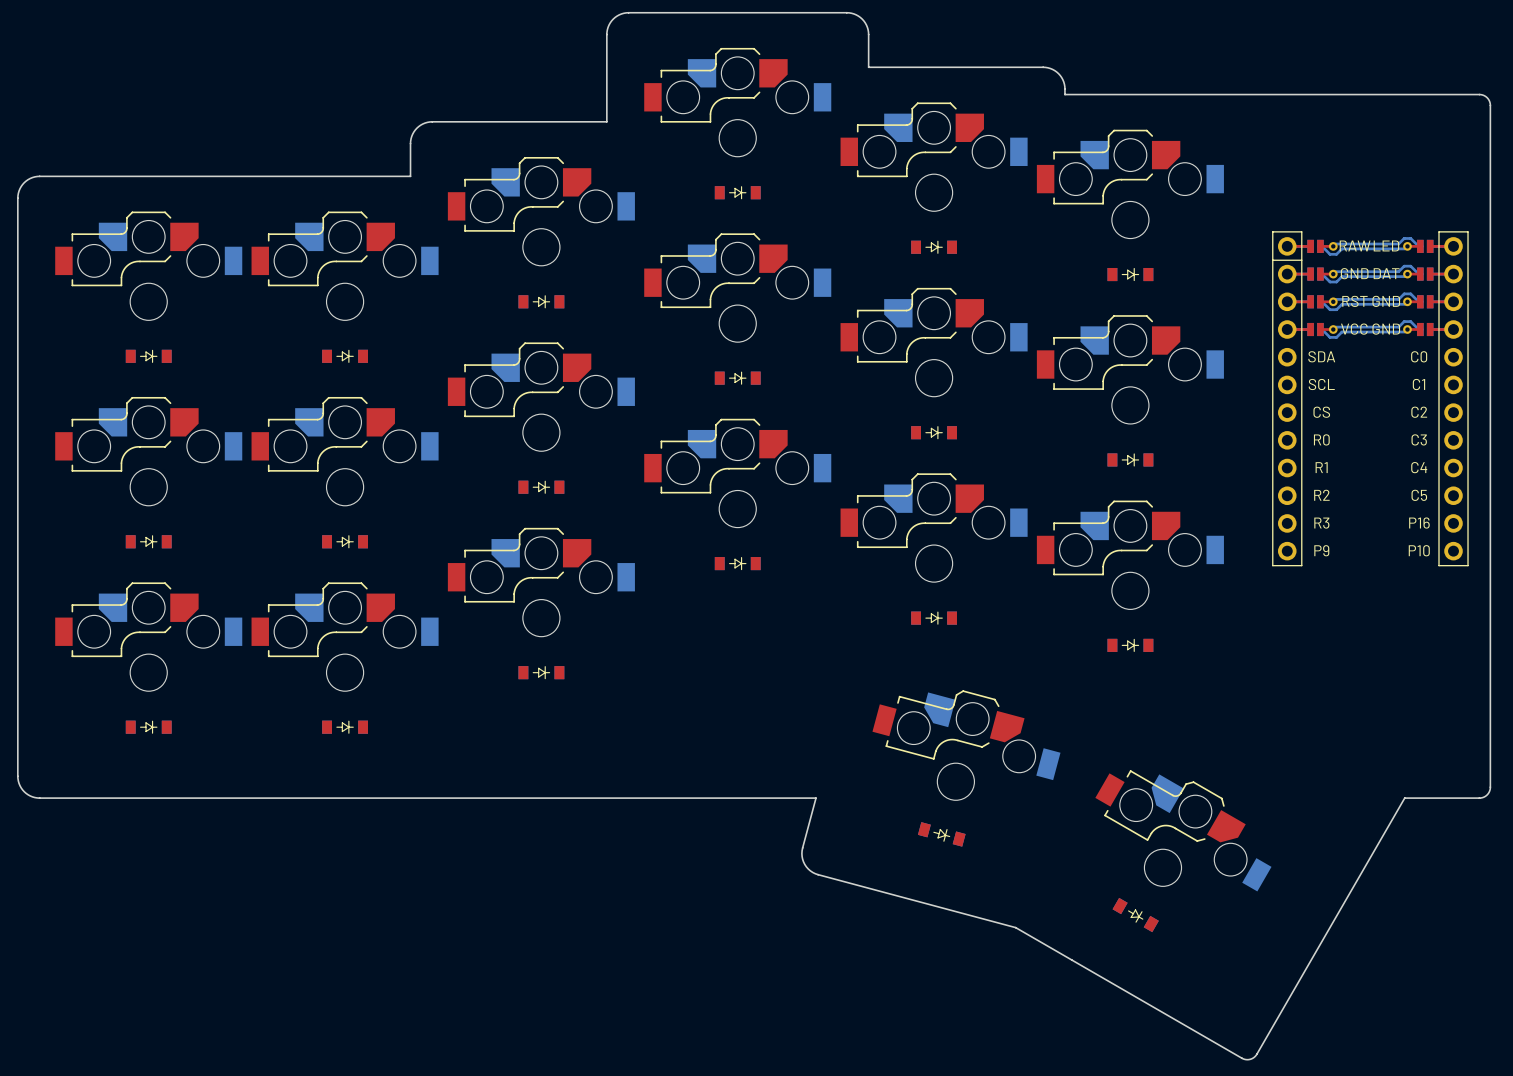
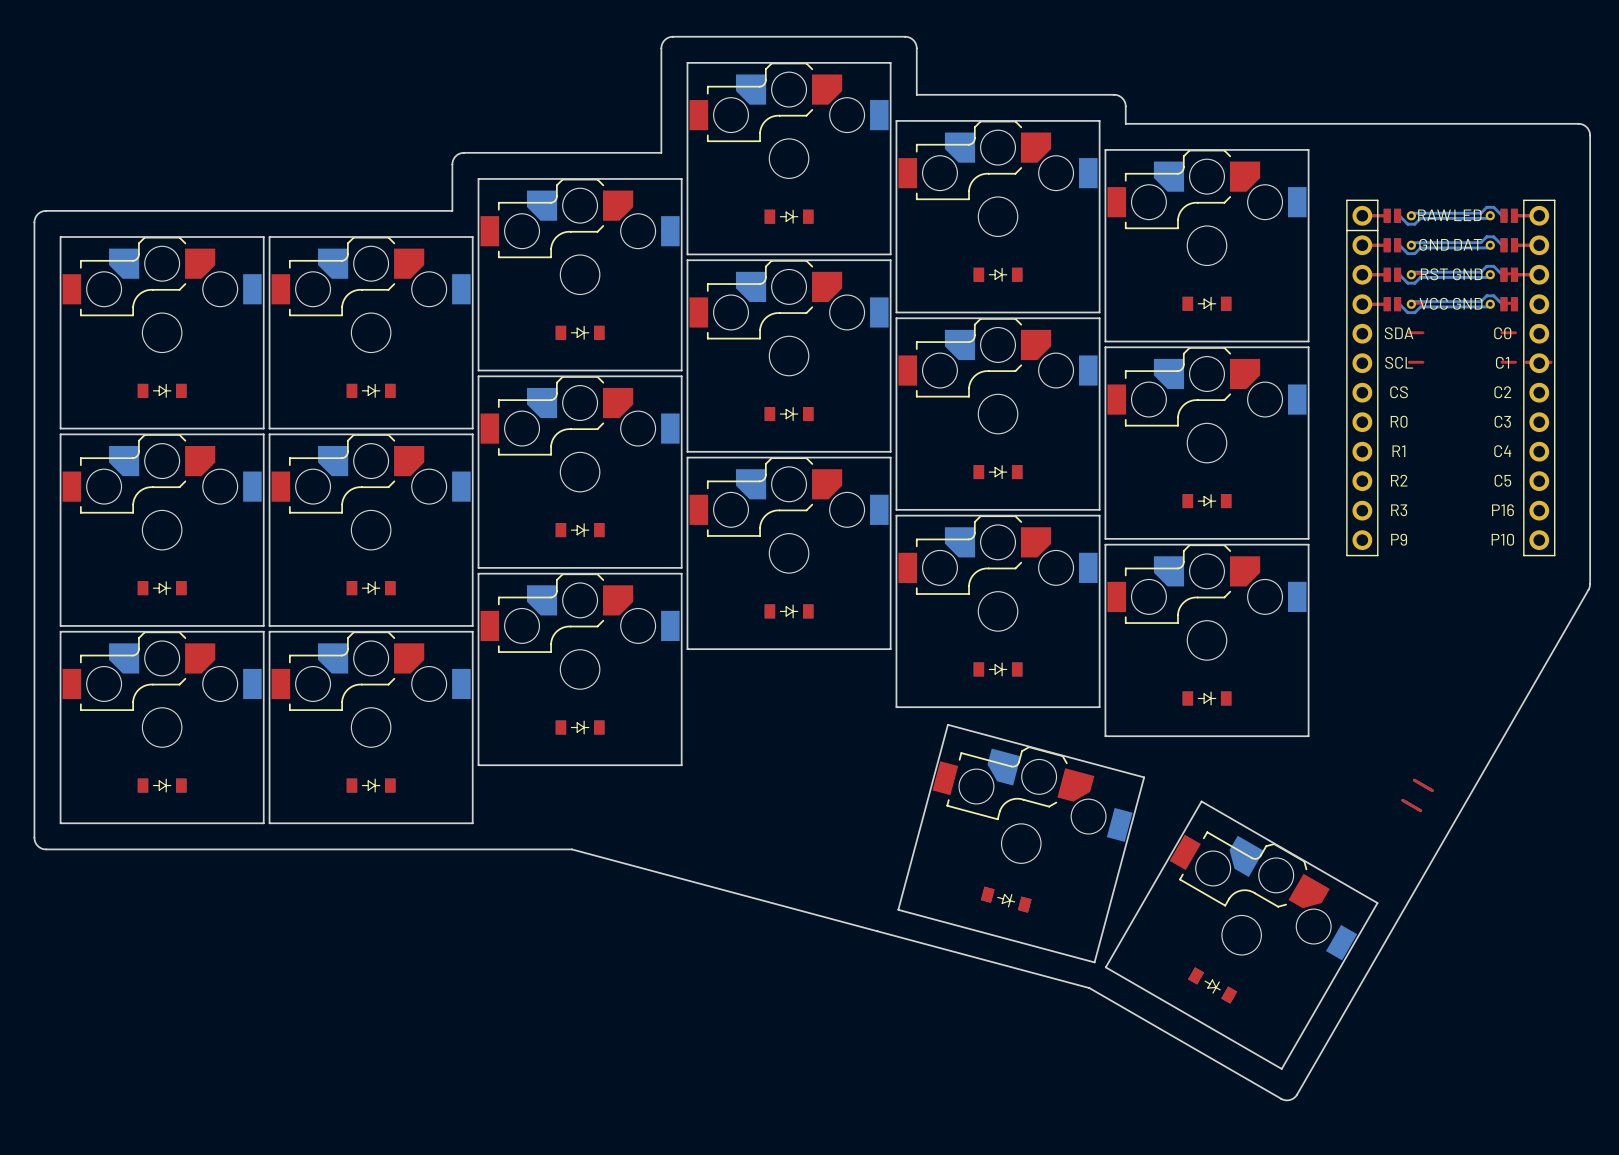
board edge: none -> (687, 62) (687, 254) (890, 254) (890, 62) (687, 62)
board edge: none -> (896, 120) (896, 312) (1099, 312) (1099, 120) (896, 120)
board edge: (1490, 116) (1489, 100) (1485, 96) (1479, 94) (1064, 94) (1064, 84) (1060, 75) (1052, 69) (1045, 67) (868, 67) (867, 27) (862, 19) (851, 13) (628, 12) (615, 17) (607, 29) (606, 121) (427, 122) (418, 126) (411, 136) (410, 176) (39, 176) (30, 178) (21, 186) (17, 198) (17, 778) (21, 787) (26, 793) (39, 798) (816, 798) (801, 853) (804, 864) (812, 872) (1015, 927) (1241, 1058) (1248, 1059) (1256, 1054) (1404, 798) (1480, 798) (1489, 791) (1490, 537) -> (1590, 135) (1586, 127) (1578, 123) (1125, 123) (1125, 102) (1121, 97) (1115, 94) (916, 94) (916, 47) (914, 41) (907, 37) (672, 36) (665, 39) (661, 47) (661, 152) (461, 153) (454, 157) (452, 163) (452, 210) (41, 212) (36, 216) (34, 222) (34, 839) (37, 846) (46, 849) (571, 849) (1089, 988) (1281, 1098) (1288, 1100) (1297, 1094) (1588, 589) (1590, 583)
board edge: none -> (1105, 149) (1105, 341) (1308, 341) (1308, 149) (1105, 149)
board edge: none -> (478, 178) (478, 370) (681, 370) (681, 178) (478, 178)
board edge: none -> (60, 237) (60, 428) (263, 428) (263, 237) (60, 237)
board edge: none -> (269, 237) (472, 237) (472, 428) (269, 428) (269, 237)
board edge: none -> (687, 260) (687, 451) (890, 451) (890, 260) (687, 260)
bottom track: (1335, 243) (1398, 243) (1404, 238) (1410, 238) (1418, 246) (1422, 246) -> (1413, 213) (1480, 213) (1486, 207) (1493, 207) (1502, 215) (1506, 215)
top track: (1287, 246) (1310, 246) -> (1362, 215) (1386, 215)
bottom track: (1318, 246) (1322, 246) (1330, 254) (1336, 254) (1341, 248) (1404, 248) -> (1395, 215) (1399, 215) (1407, 224) (1414, 224) (1420, 218) (1487, 218)
top track: (1430, 246) (1453, 246) -> (1514, 215) (1539, 215)
bottom track: (1335, 271) (1398, 271) (1404, 266) (1410, 266) (1418, 274) (1422, 274) -> (1413, 242) (1480, 242) (1486, 236) (1493, 236) (1502, 245) (1506, 245)
top track: (1287, 274) (1310, 274) -> (1362, 245) (1386, 245)
bottom track: (1318, 274) (1322, 274) (1330, 282) (1336, 282) (1341, 276) (1404, 276) -> (1395, 245) (1399, 245) (1407, 253) (1414, 253) (1420, 247) (1487, 247)
top track: (1430, 274) (1453, 274) -> (1514, 245) (1539, 245)
board edge: none -> (896, 318) (896, 509) (1099, 509) (1099, 318) (896, 318)
bottom track: (1335, 299) (1398, 299) (1404, 293) (1410, 293) (1418, 301) (1422, 301) -> (1413, 272) (1480, 272) (1486, 266) (1493, 266) (1502, 274) (1506, 274)
top track: (1287, 301) (1310, 301) -> (1362, 274) (1386, 274)
bottom track: (1318, 301) (1322, 301) (1330, 309) (1336, 309) (1341, 304) (1404, 304) -> (1395, 274) (1399, 274) (1407, 283) (1414, 283) (1420, 277) (1487, 277)
top track: (1430, 301) (1453, 301) -> (1514, 274) (1539, 274)
board edge: none -> (1105, 347) (1105, 538) (1308, 538) (1308, 347) (1105, 347)
bottom track: (1335, 327) (1398, 327) (1404, 321) (1410, 321) (1418, 329) (1422, 329) -> (1413, 301) (1480, 301) (1486, 295) (1493, 295) (1502, 304) (1506, 304)
top track: (1287, 329) (1310, 329) -> (1362, 304) (1386, 304)
bottom track: (1318, 329) (1322, 329) (1330, 337) (1336, 337) (1341, 332) (1404, 332) -> (1395, 304) (1399, 304) (1407, 312) (1414, 312) (1420, 306) (1487, 306)
board edge: none -> (478, 376) (478, 567) (681, 567) (681, 376) (478, 376)
board edge: none -> (60, 434) (60, 625) (263, 625) (263, 434) (60, 434)
board edge: none -> (269, 434) (472, 434) (472, 625) (269, 625) (269, 434)
part position: (1370, 398) -> (1450, 377)
board edge: none -> (687, 457) (890, 457) (890, 649) (687, 649) (687, 457)
board edge: none -> (896, 515) (1099, 515) (1099, 707) (896, 707) (896, 515)
board edge: none -> (1105, 544) (1308, 544) (1308, 736) (1105, 736) (1105, 544)
board edge: none -> (478, 573) (681, 573) (681, 765) (478, 765) (478, 573)
board edge: none -> (60, 631) (263, 631) (263, 823) (60, 823) (60, 631)
board edge: none -> (269, 631) (472, 631) (472, 823) (269, 823) (269, 631)
board edge: none -> (947, 724) (1144, 777) (1094, 962) (898, 909) (947, 724)
top track: none -> (1414, 780) (1432, 790)
top track: none -> (1402, 800) (1420, 810)
board edge: none -> (1201, 801) (1377, 903) (1281, 1068) (1105, 967) (1201, 801)

